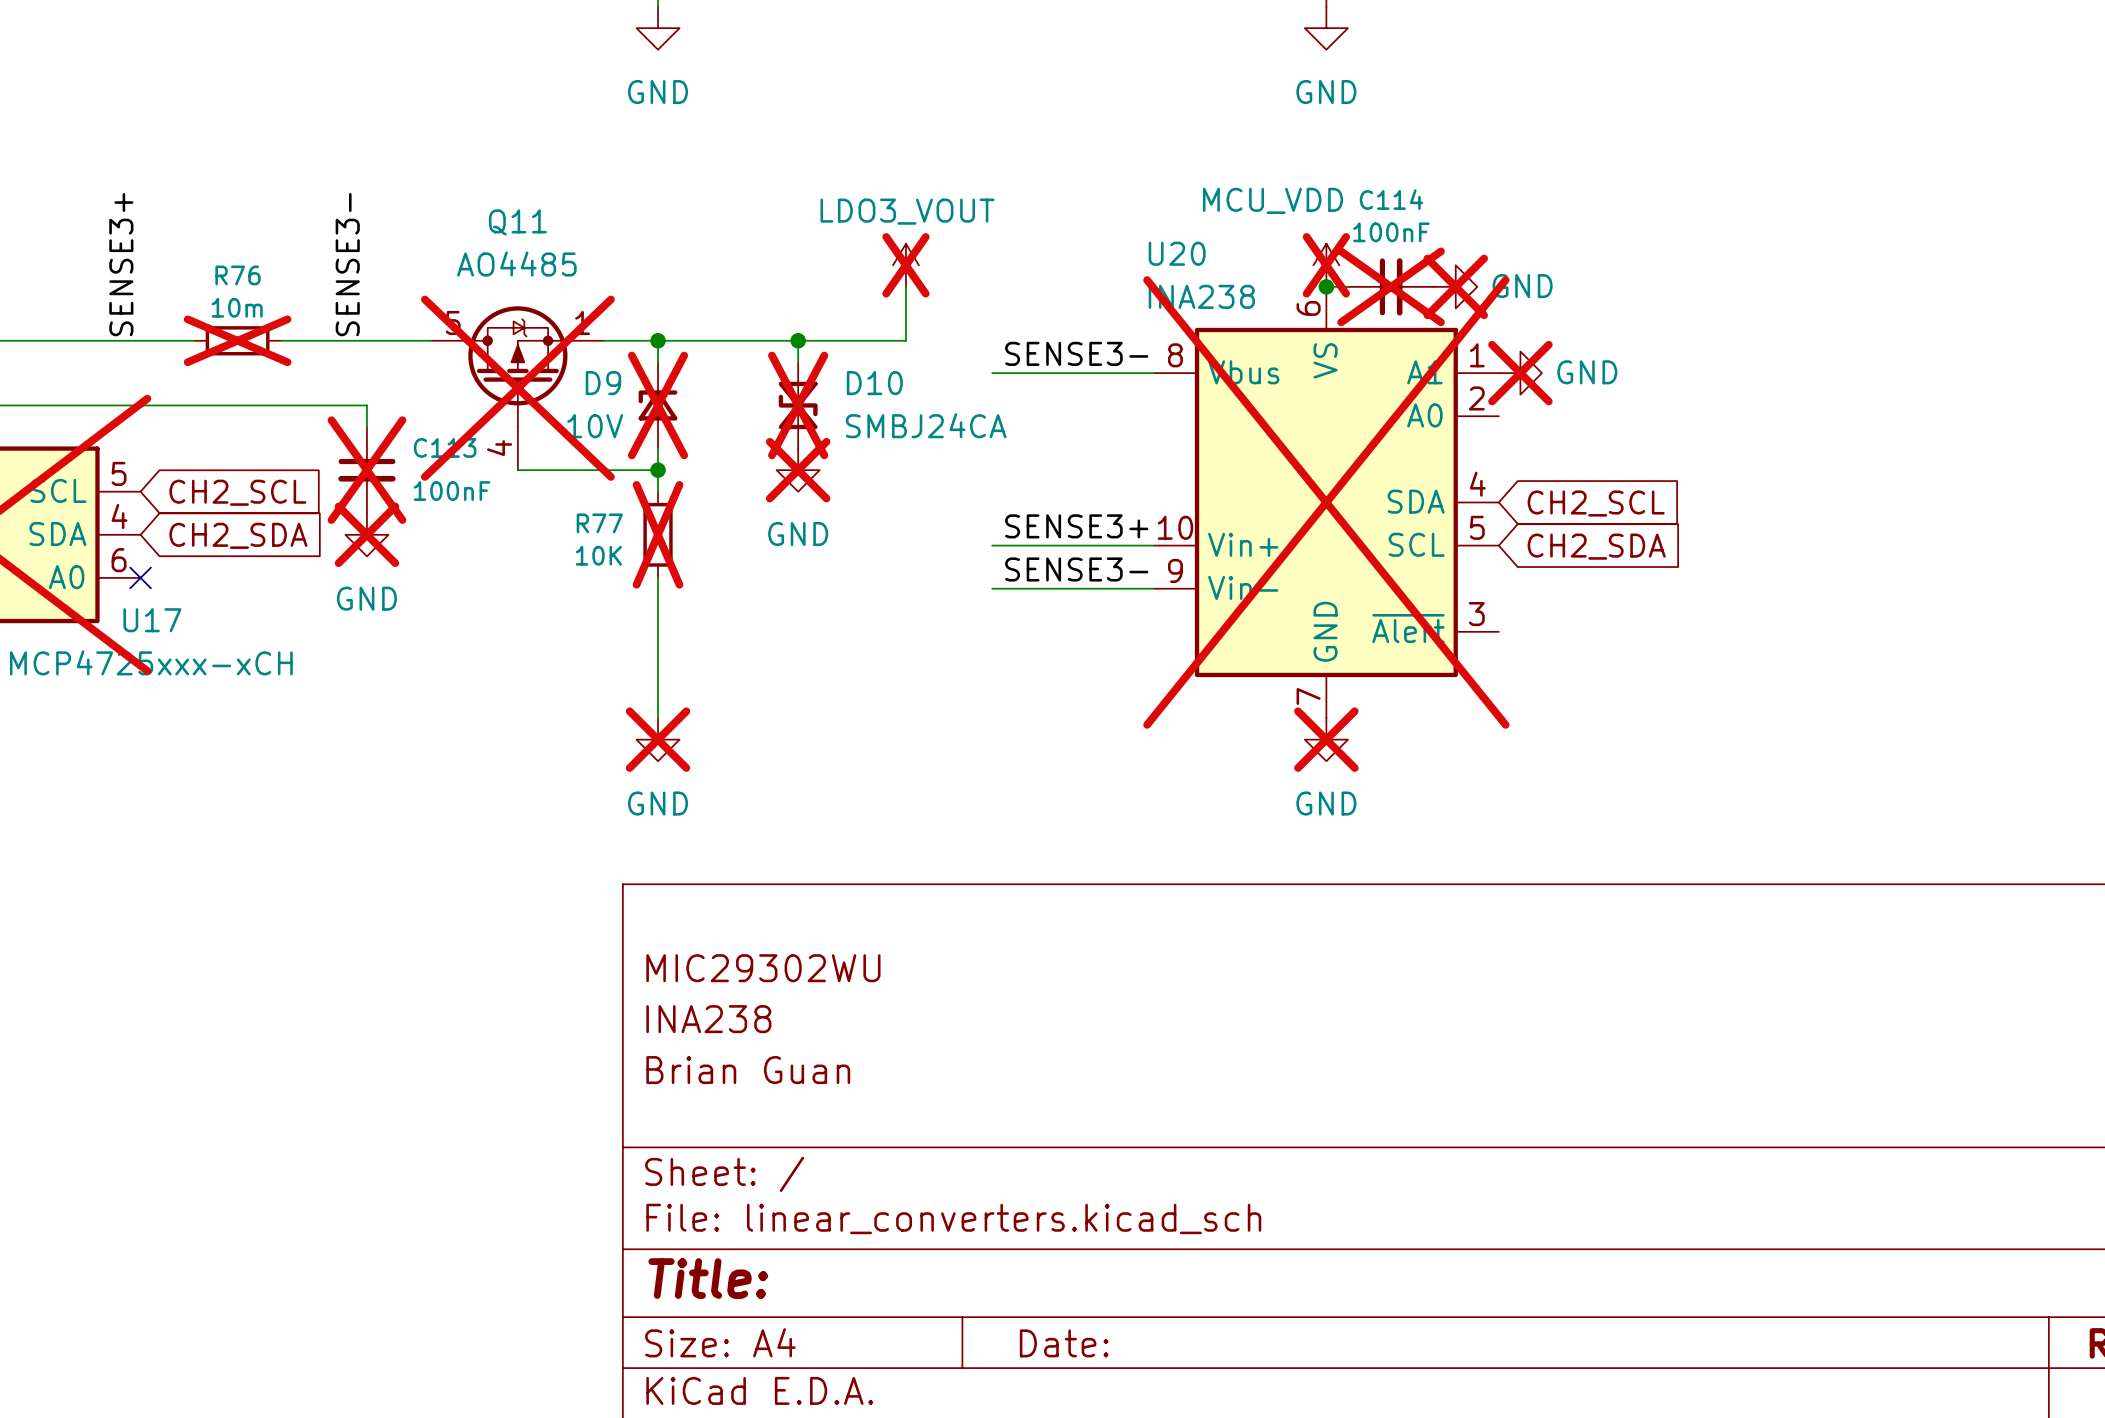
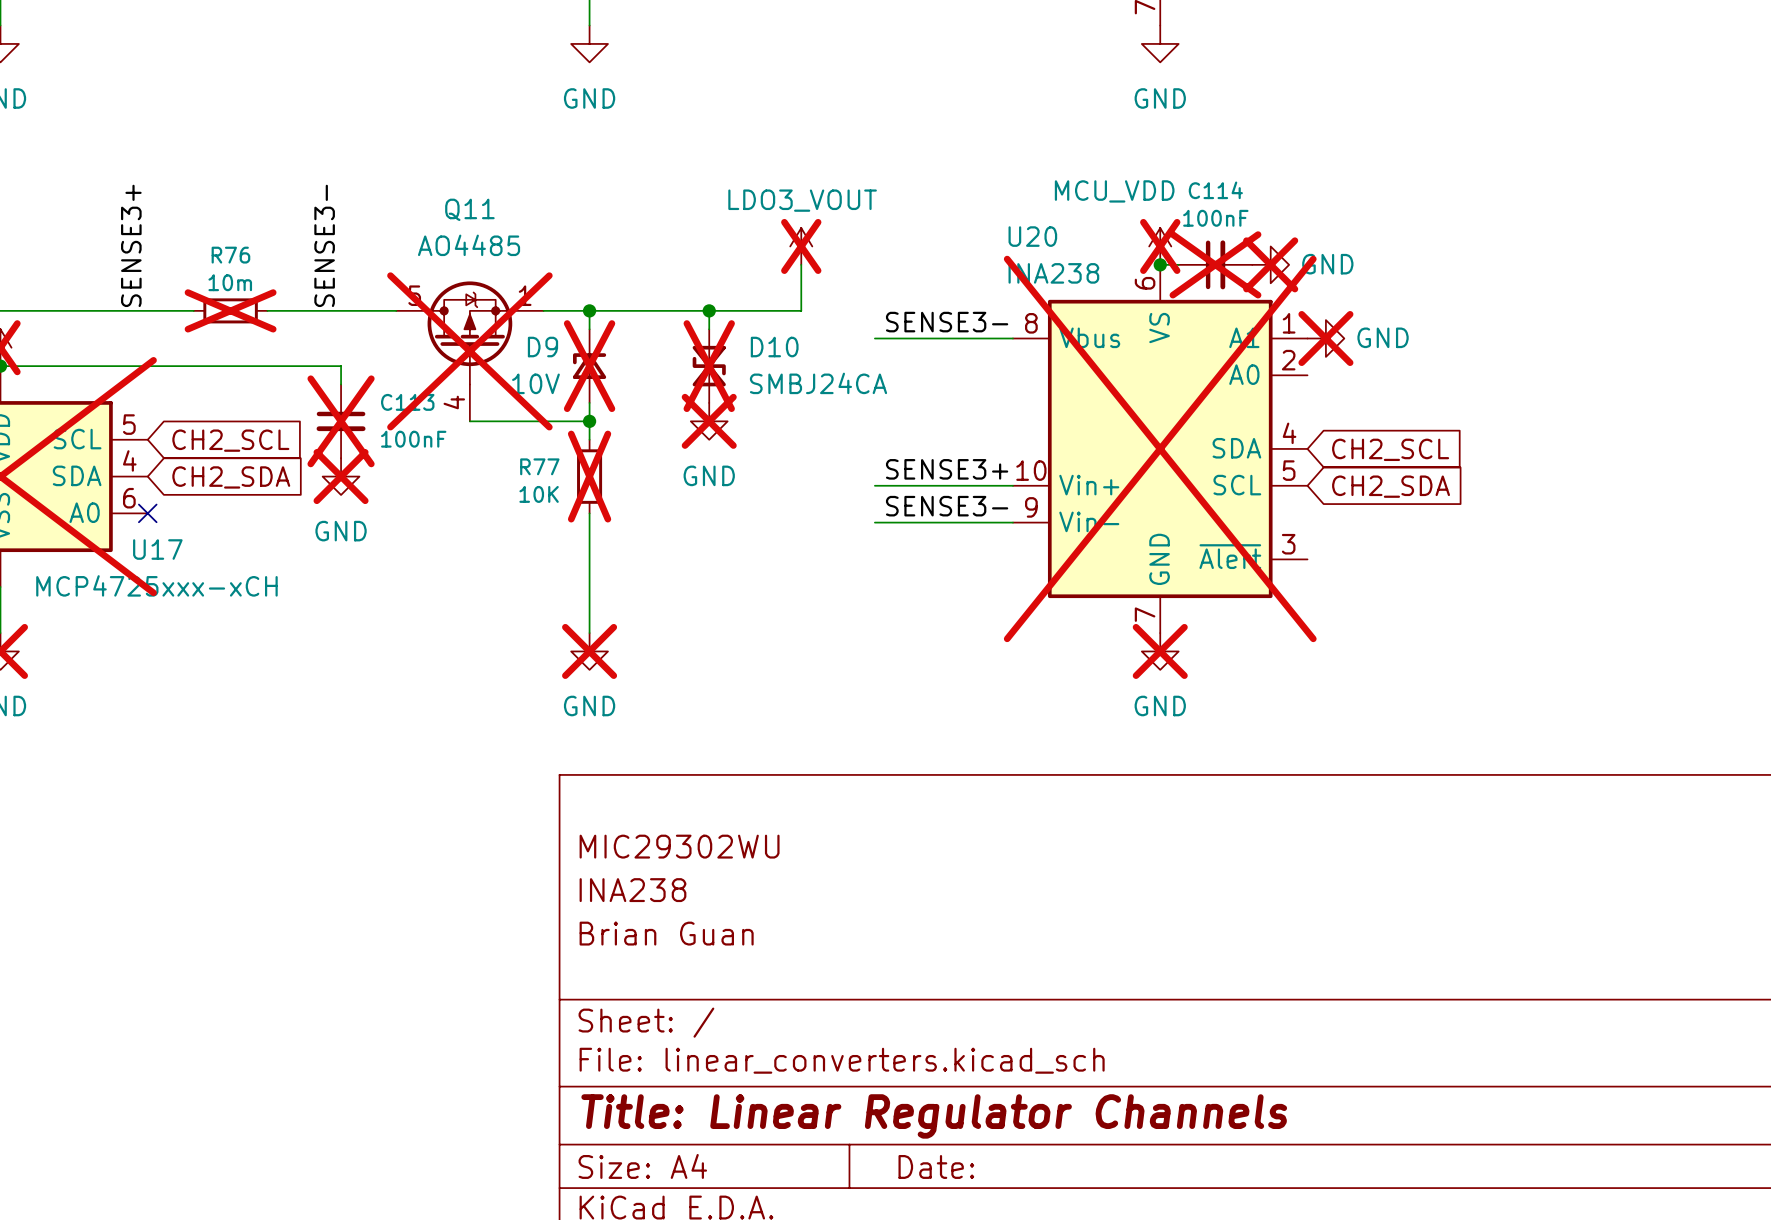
title block: Title: (708, 1278) -> Title: Linear Regulator Channels (934, 1116)

